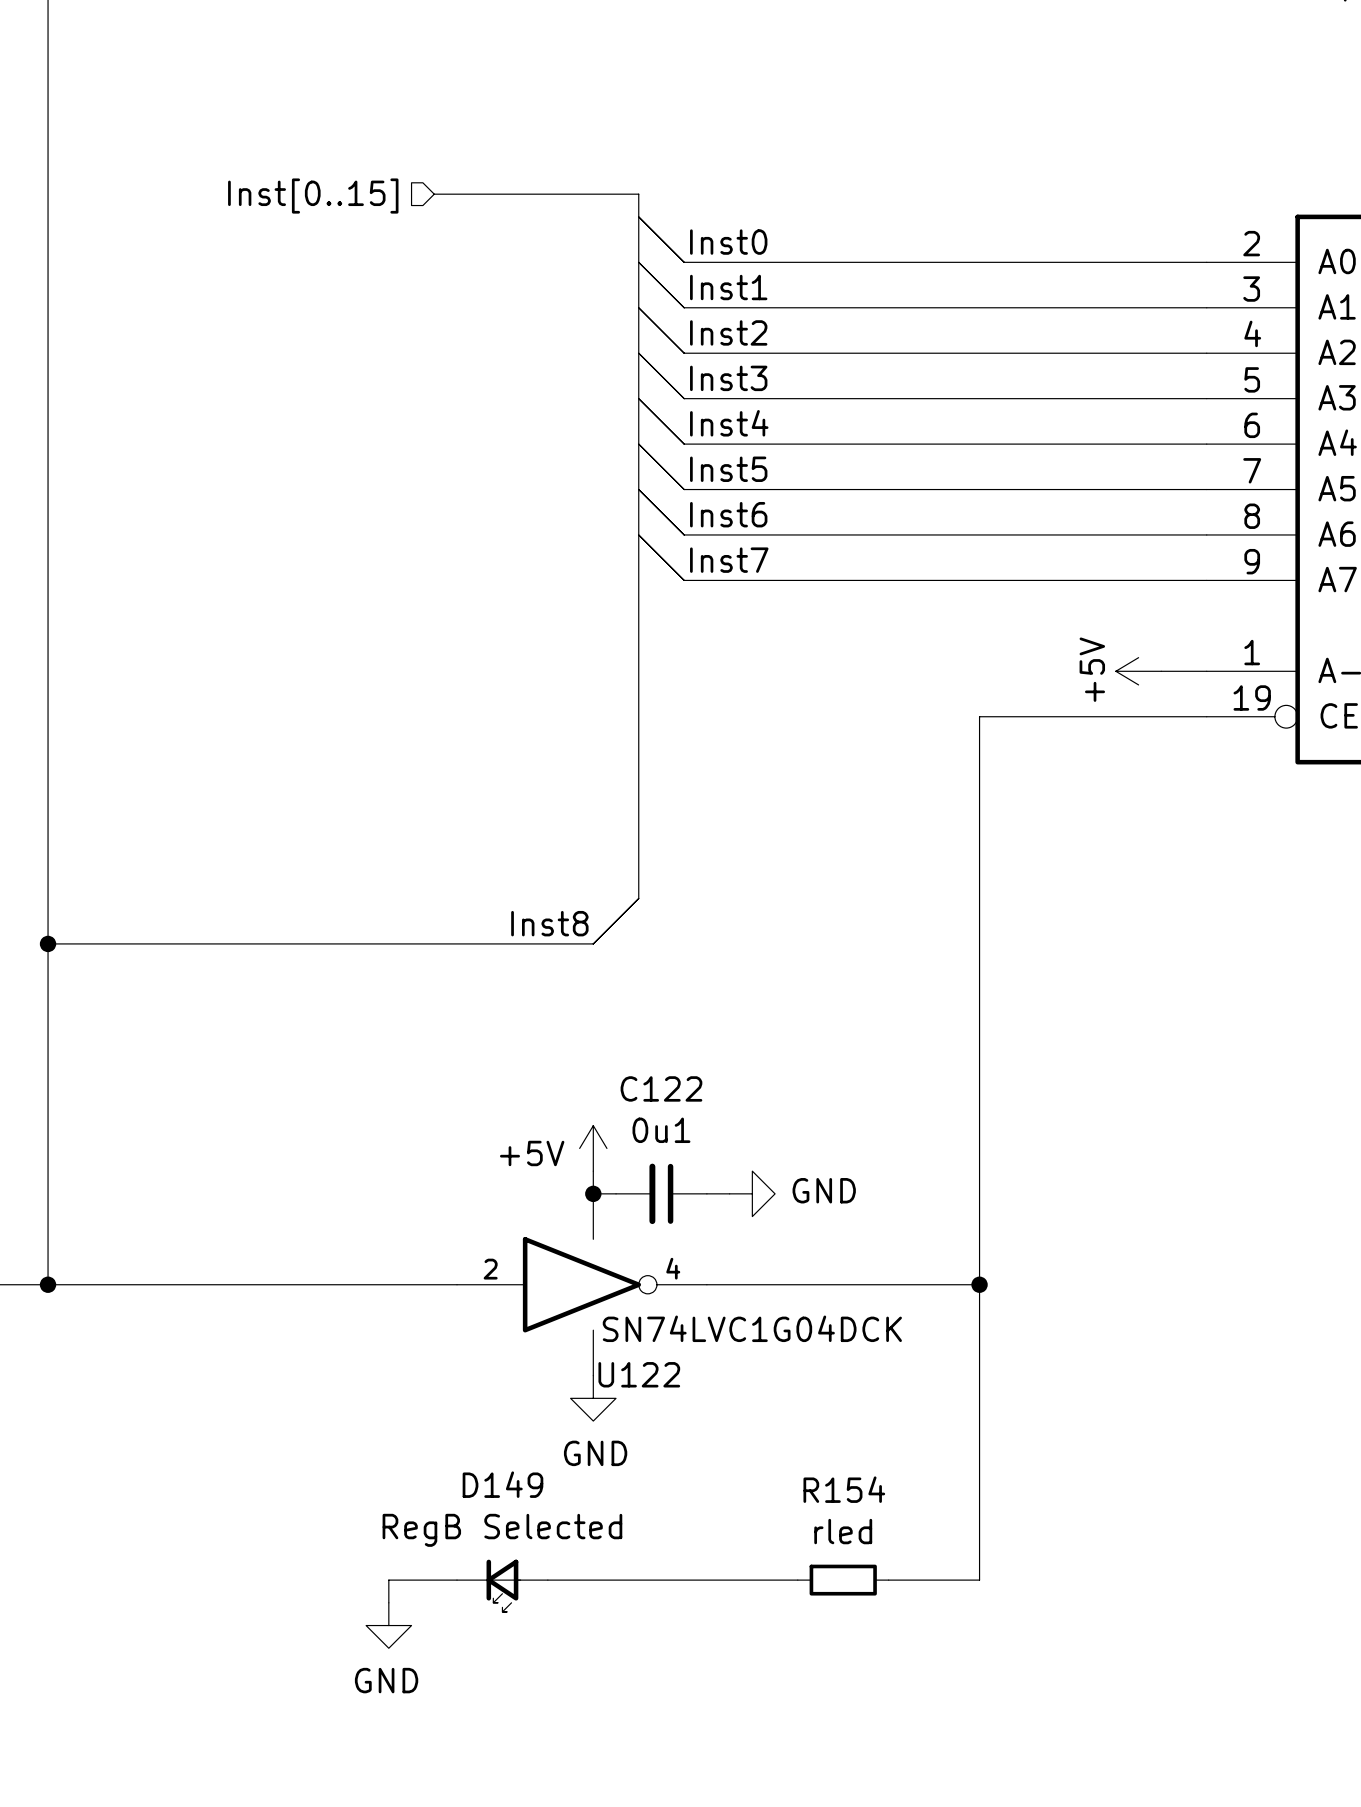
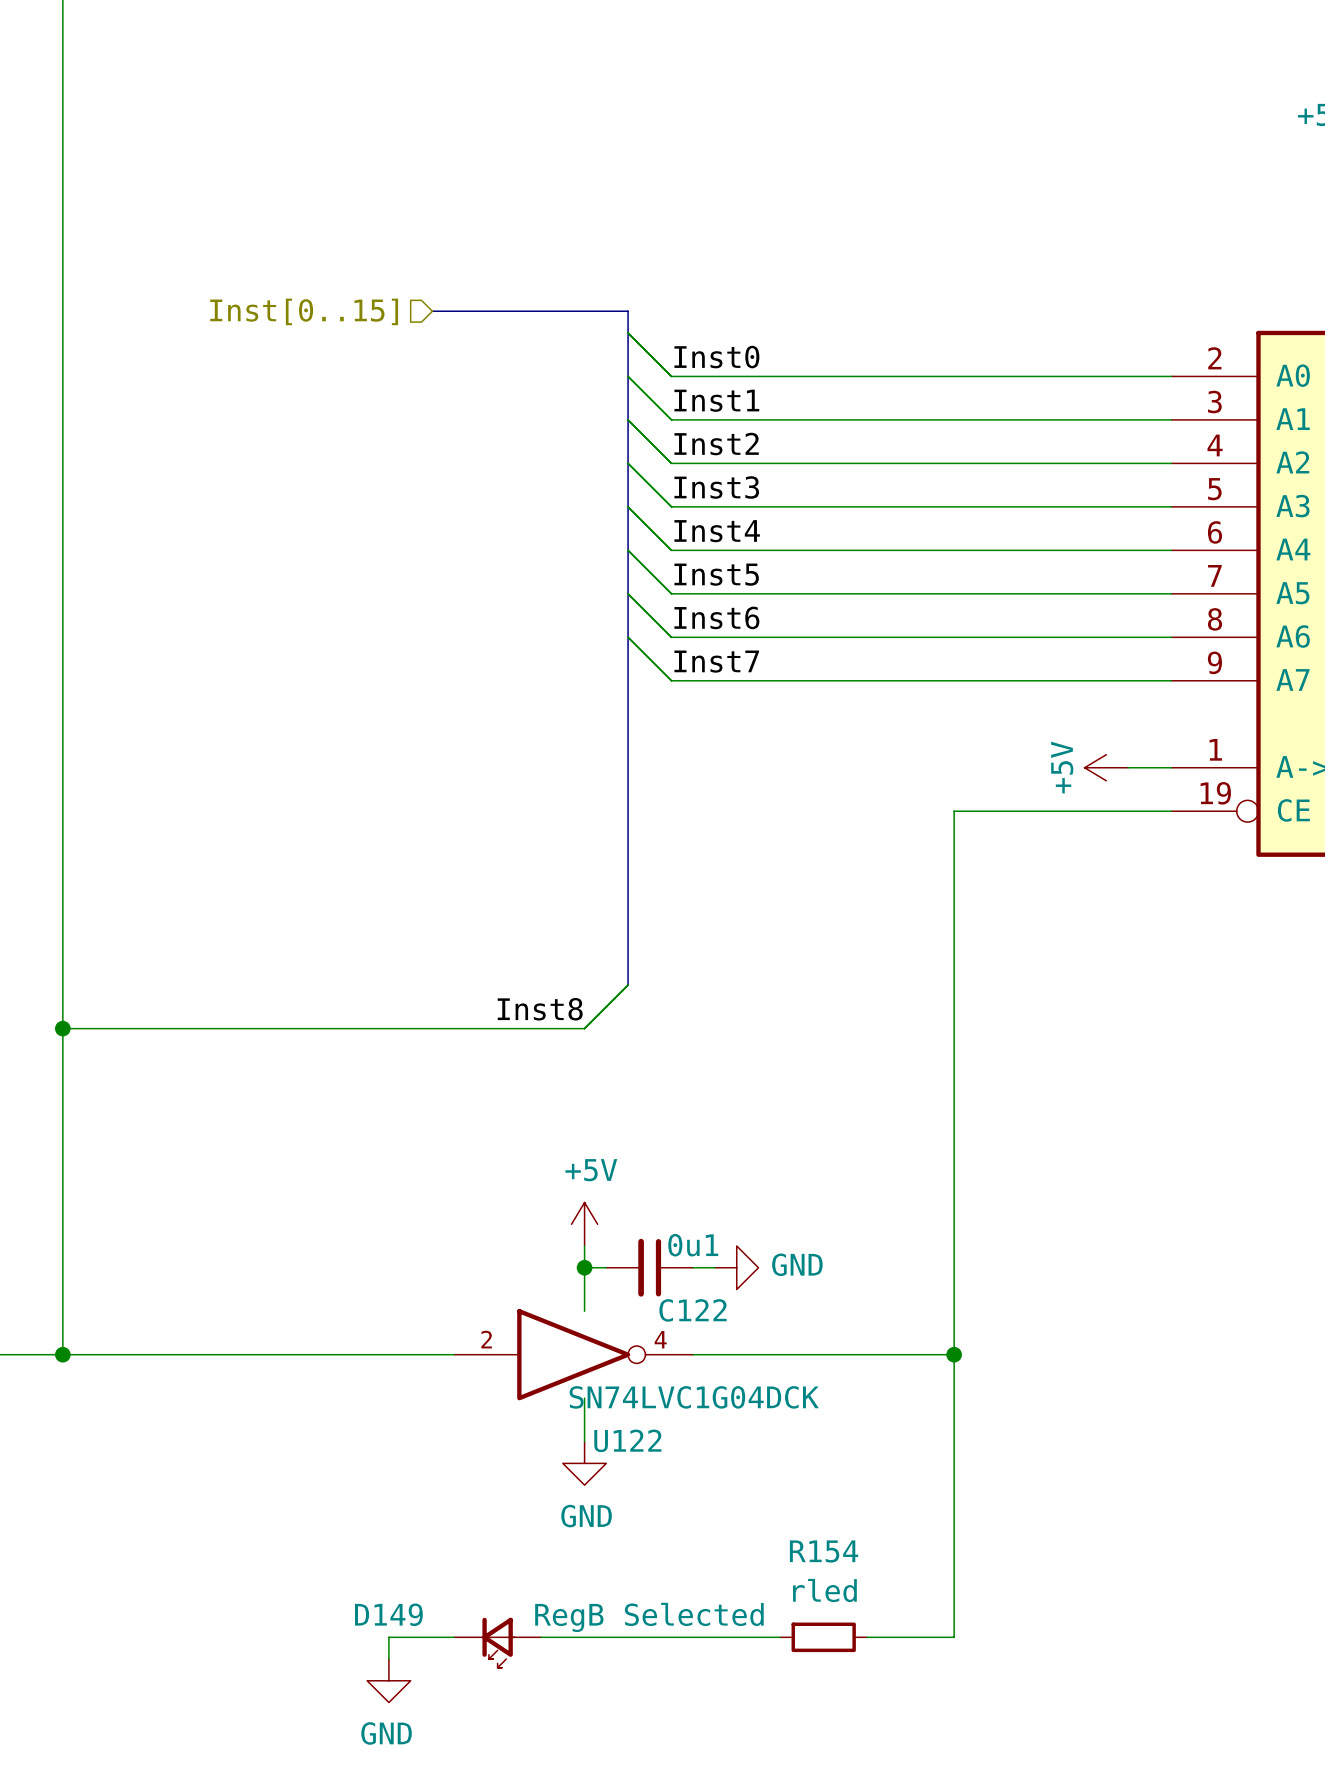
C122 name position: C122 (661, 1088) -> C122 (693, 1310)
C122 value position: 0u1 (661, 1130) -> 0u1 (693, 1245)
power symbol text position: +5V (532, 1153) -> +5V (591, 1170)
U122 value position: SN74LVC1G04DCK (752, 1328) -> SN74LVC1G04DCK (694, 1397)
D149 name position: D149 (502, 1484) -> D149 (388, 1614)
D149 value position: RegB Selected (502, 1530) -> RegB Selected (649, 1617)

